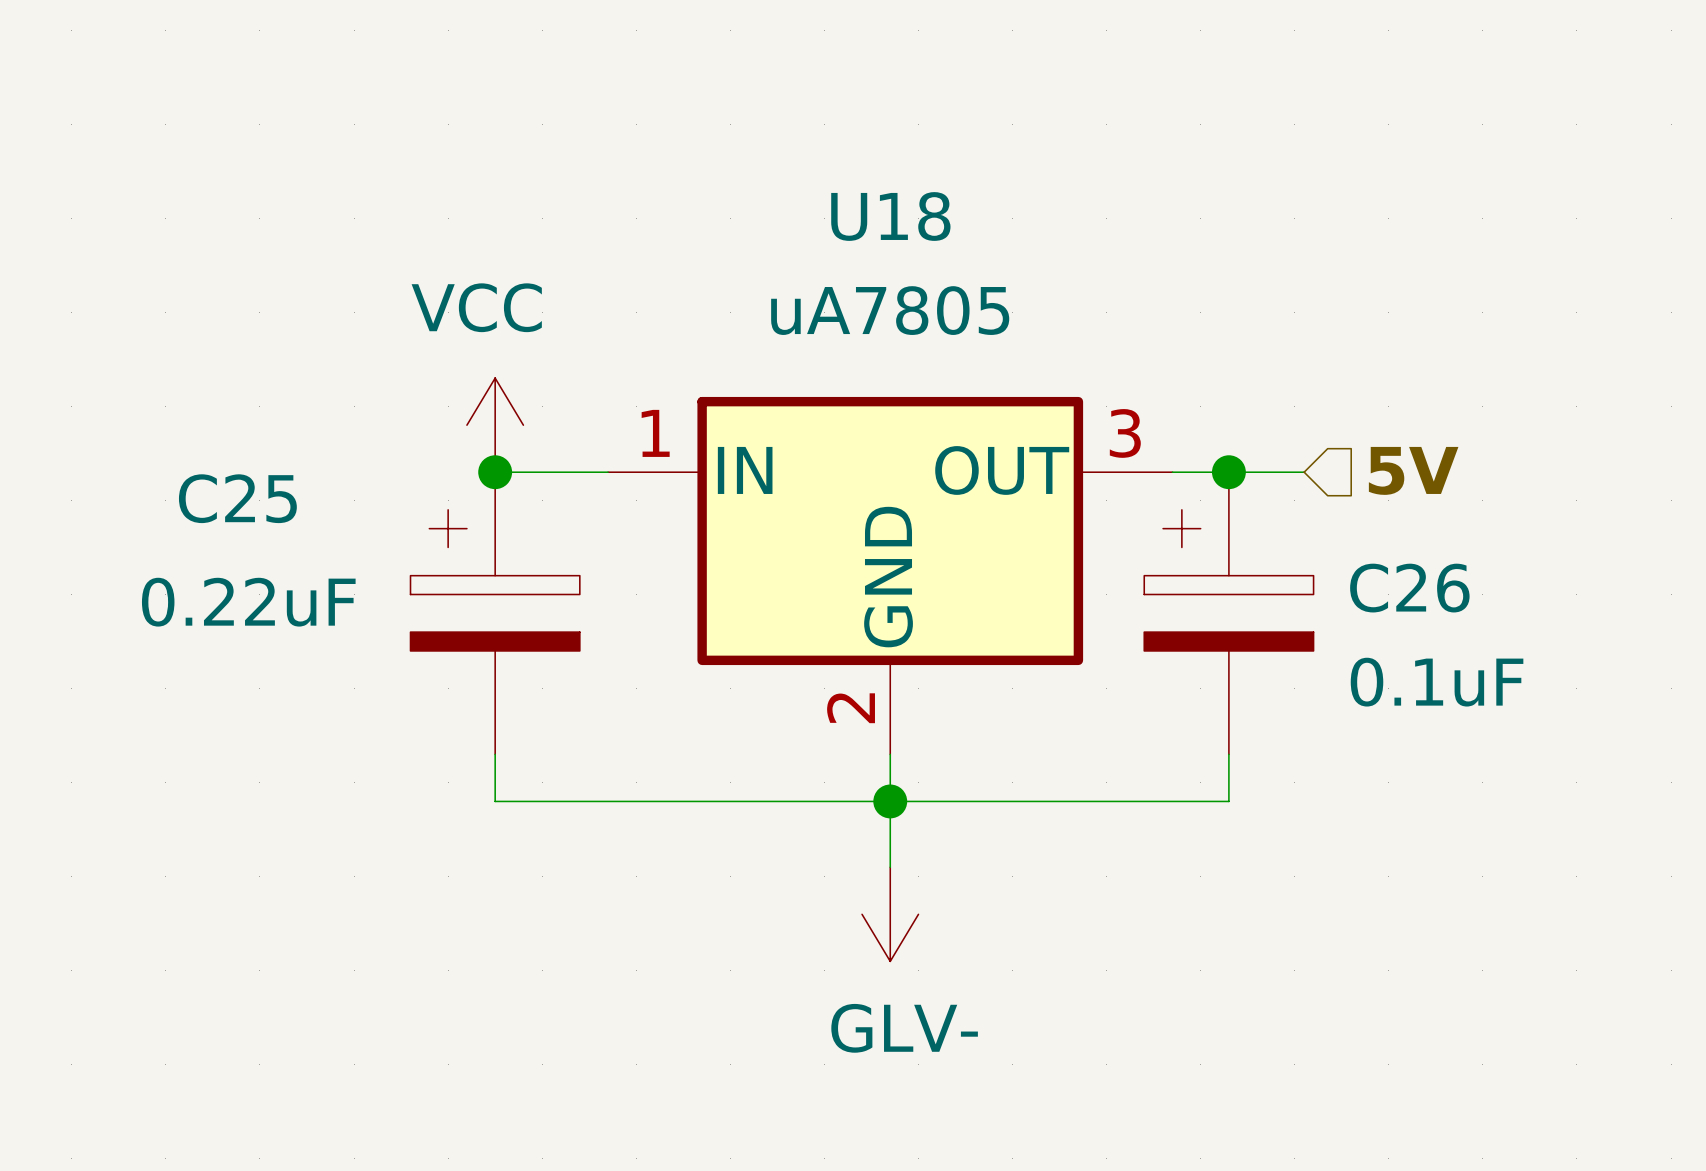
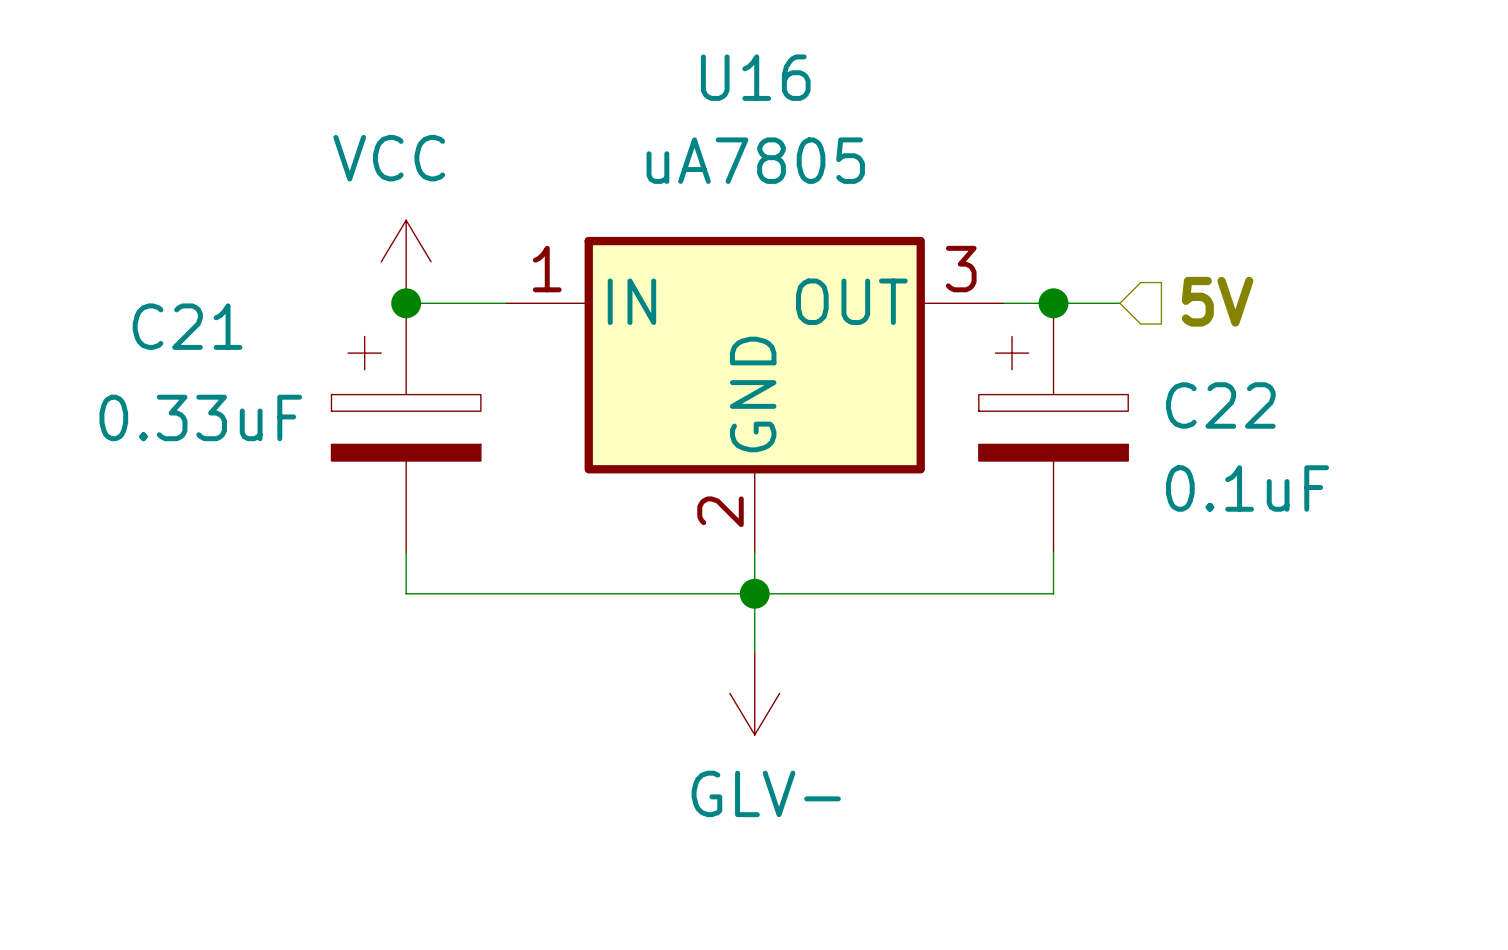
U18 name: U18 (890, 216) -> U16 (755, 77)
C25 name: C25 (237, 498) -> C21 (187, 326)
C26 name: C26 (1409, 588) -> C22 (1220, 405)
C25 value: 0.22uF (248, 602) -> 0.33uF (200, 417)

